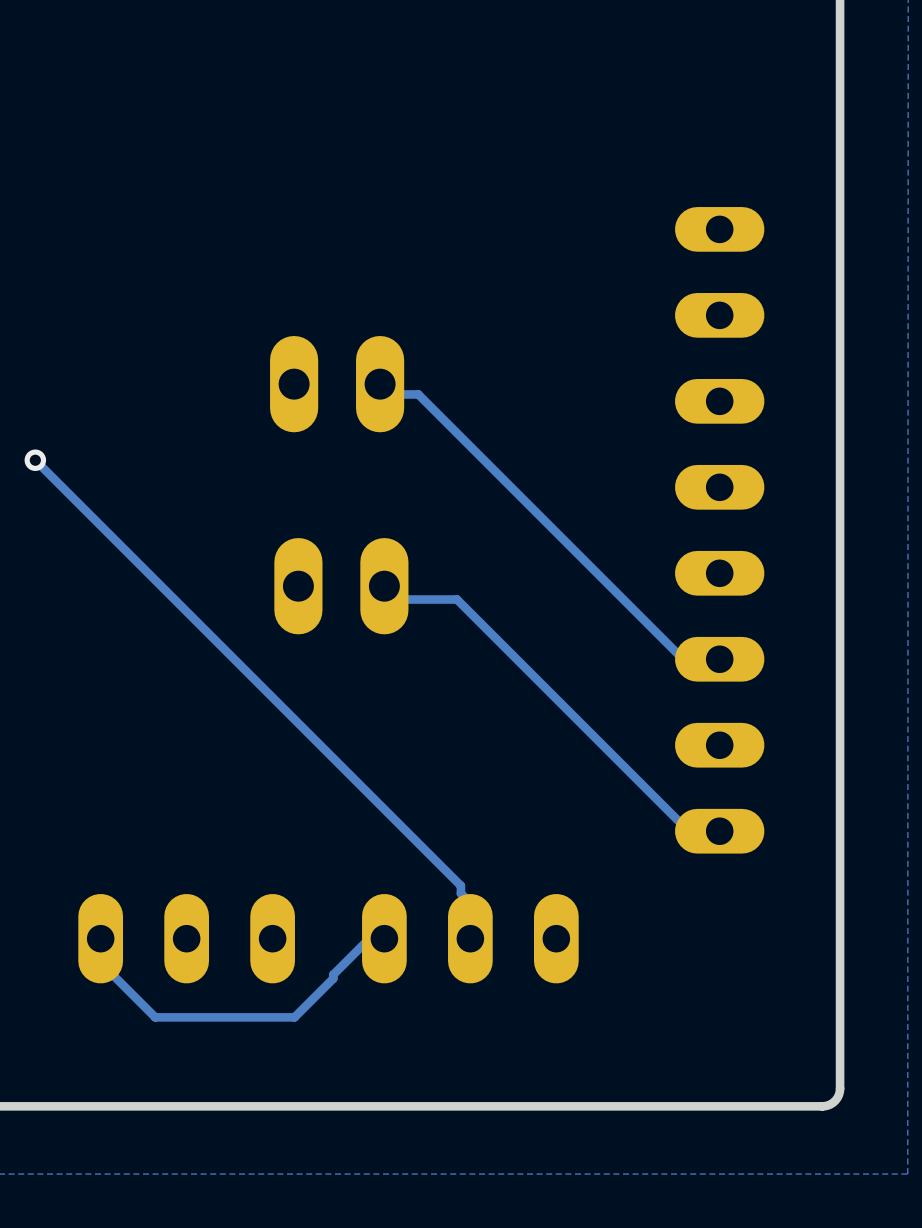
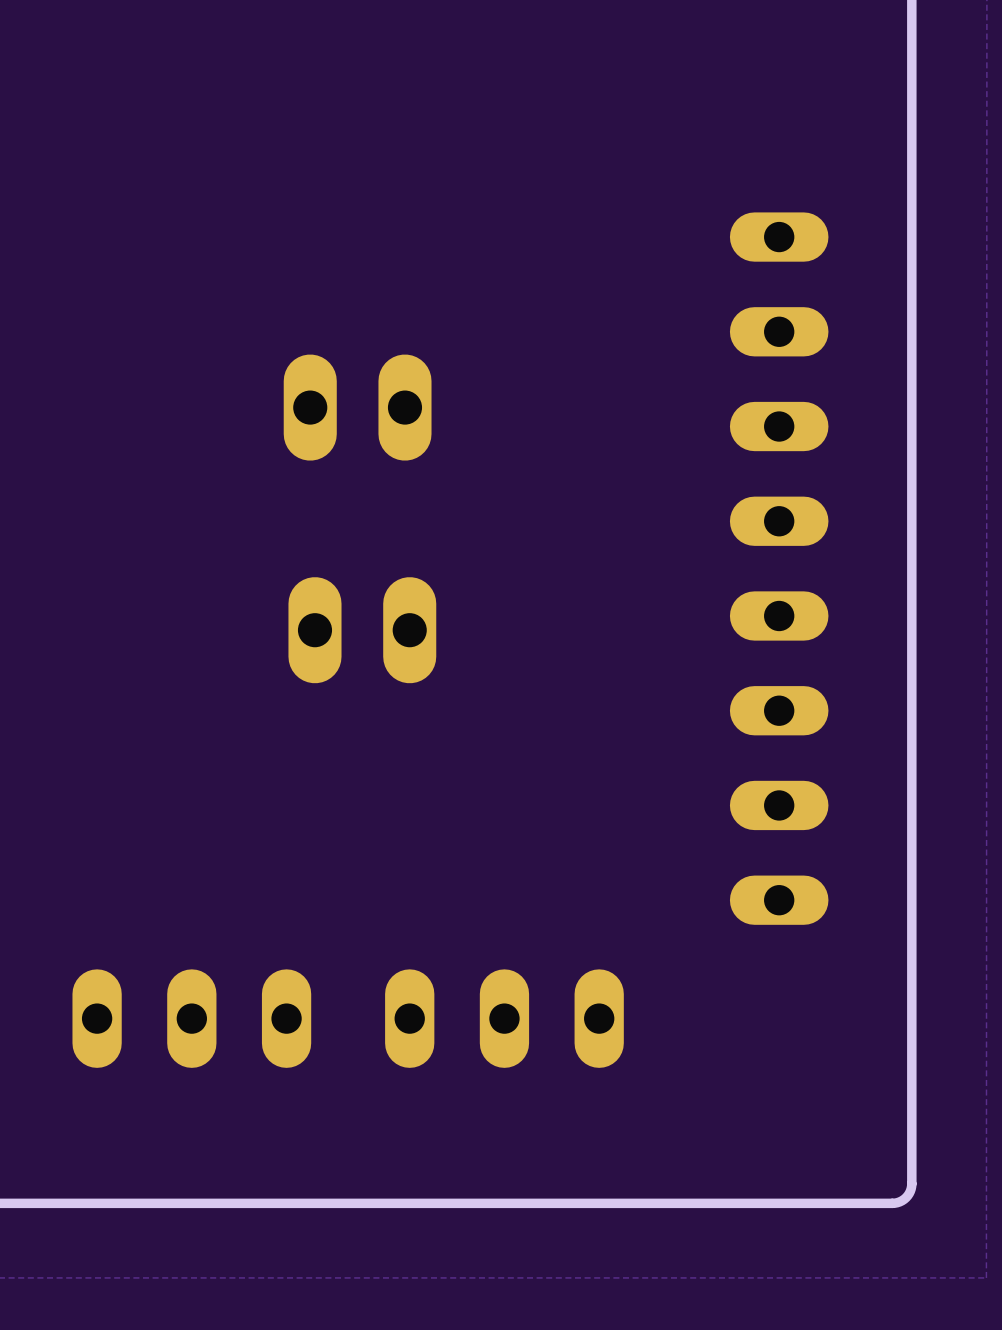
track: (380, 384) (391, 394) (418, 394) (681, 657) (716, 657) (719, 659) -> none
track: (35, 460) (460, 885) (460, 893) (468, 901) (468, 936) (470, 938) -> none
via: (35, 460) -> none
track: (384, 586) (399, 599) (457, 599) (685, 827) (716, 827) (719, 831) -> none
track: (384, 938) (368, 939) (294, 1017) (155, 1017) (101, 963) (100, 938) -> none

